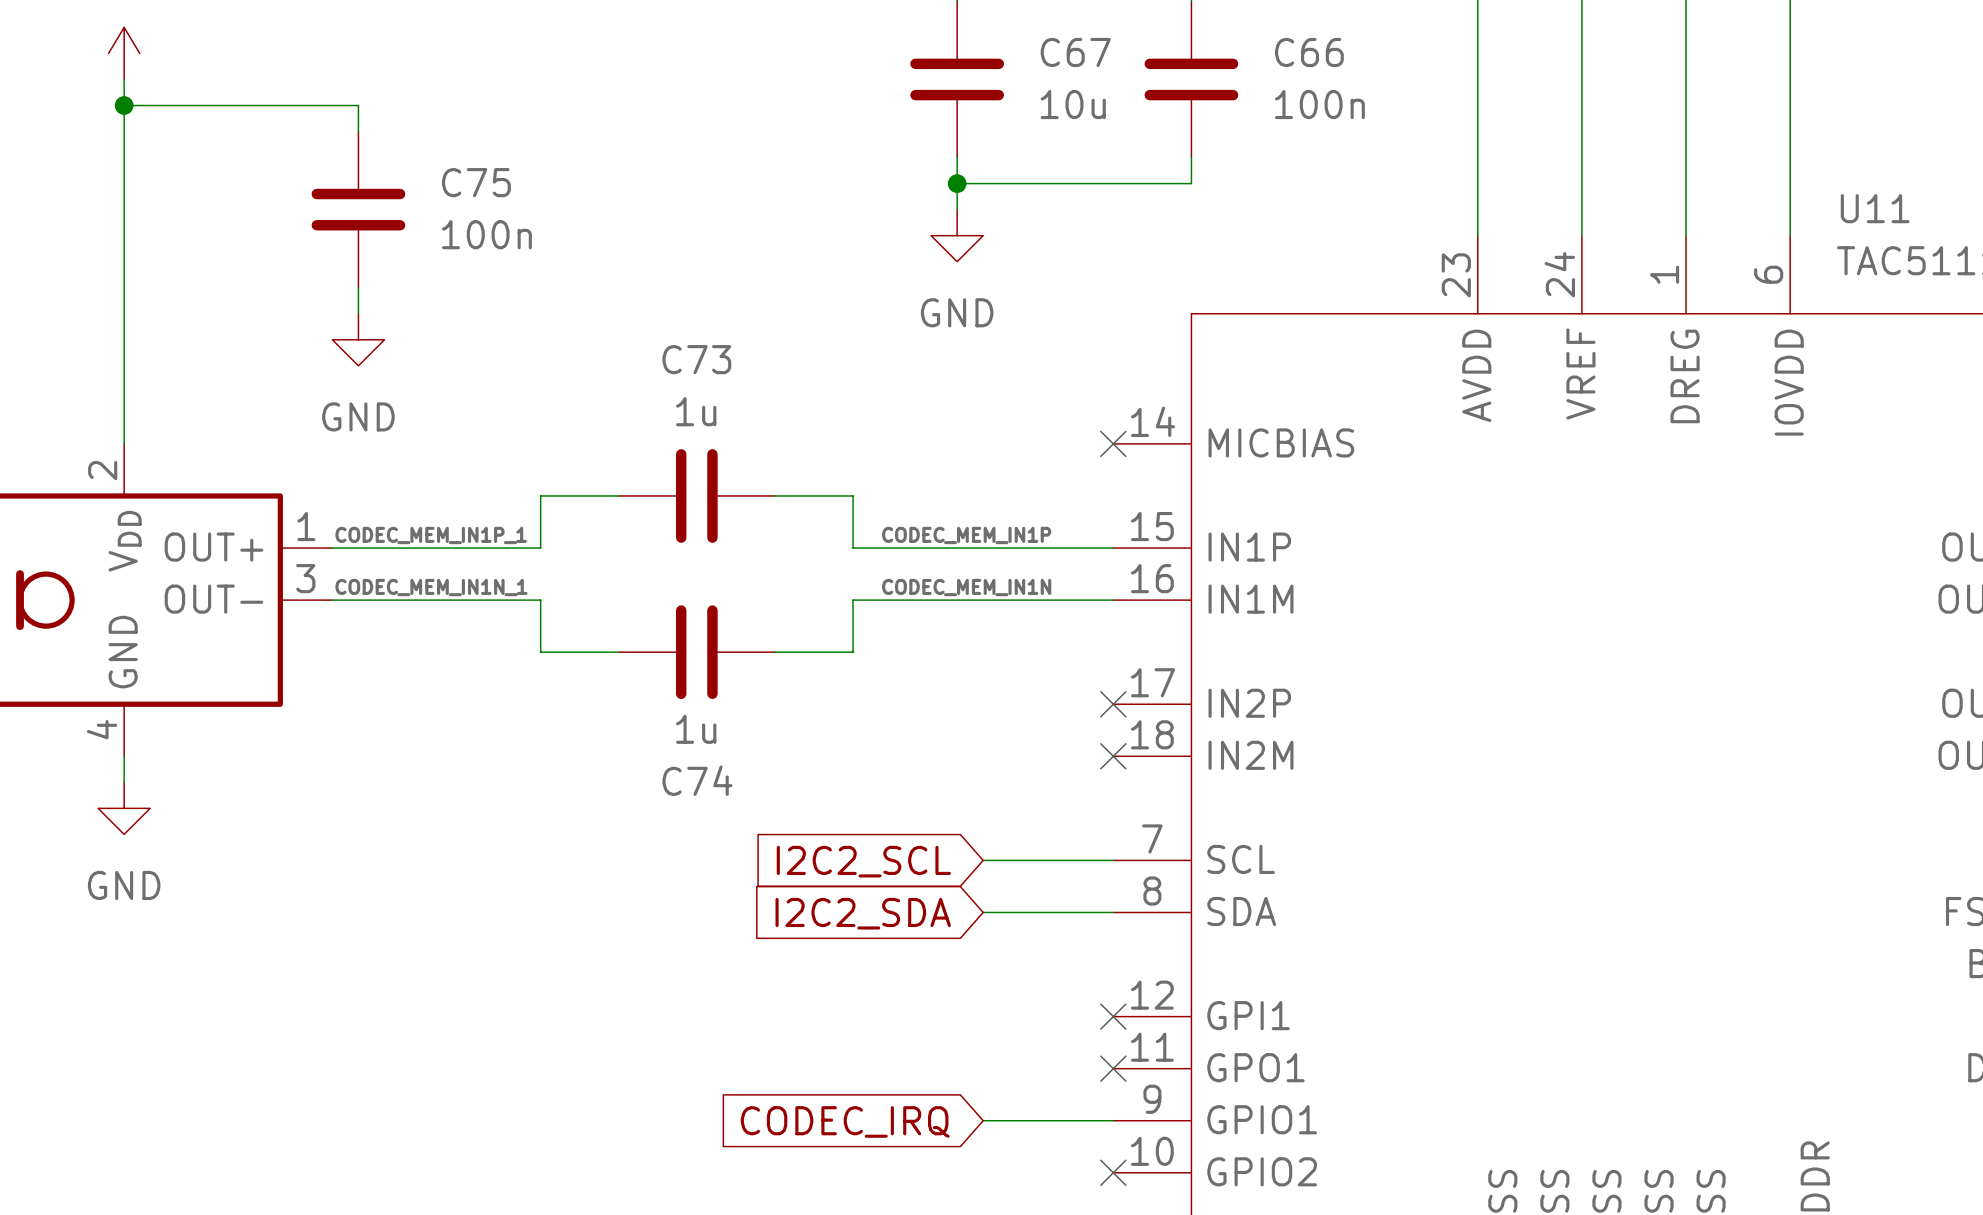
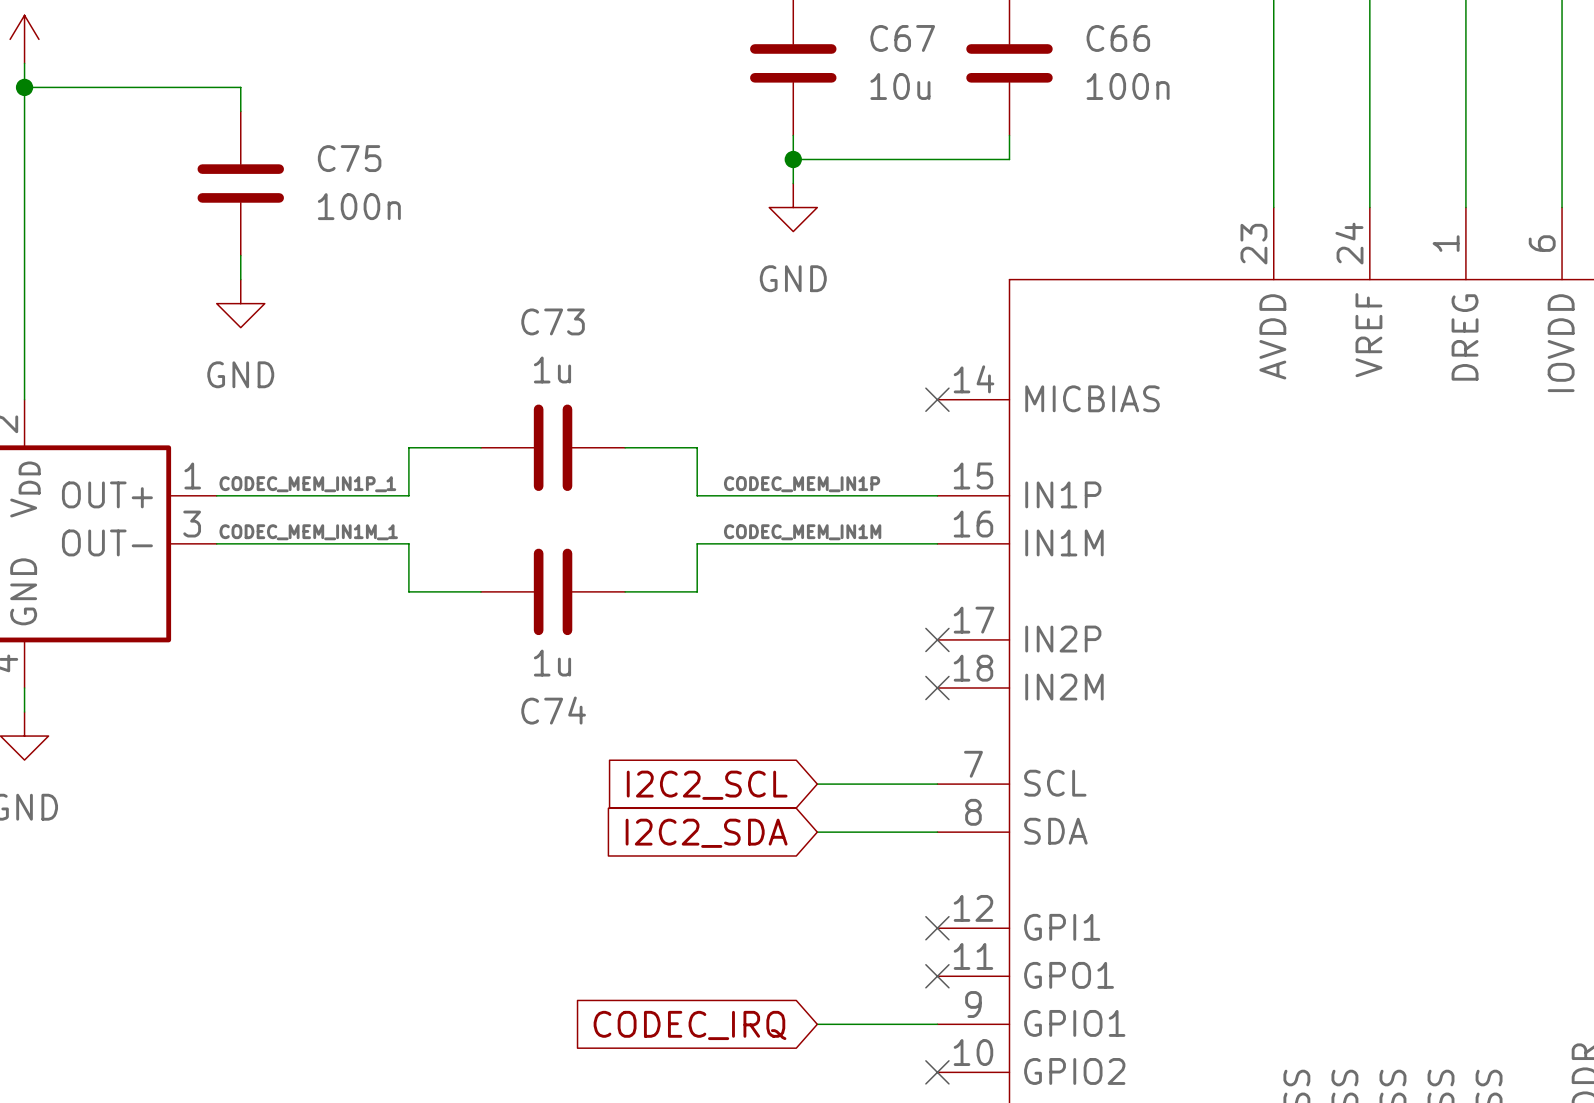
label: CODEC_MEM_IN1N_1 (431, 587) -> CODEC_MEM_IN1M_1 (308, 532)
label: CODEC_MEM_IN1N (966, 587) -> CODEC_MEM_IN1M (802, 532)

